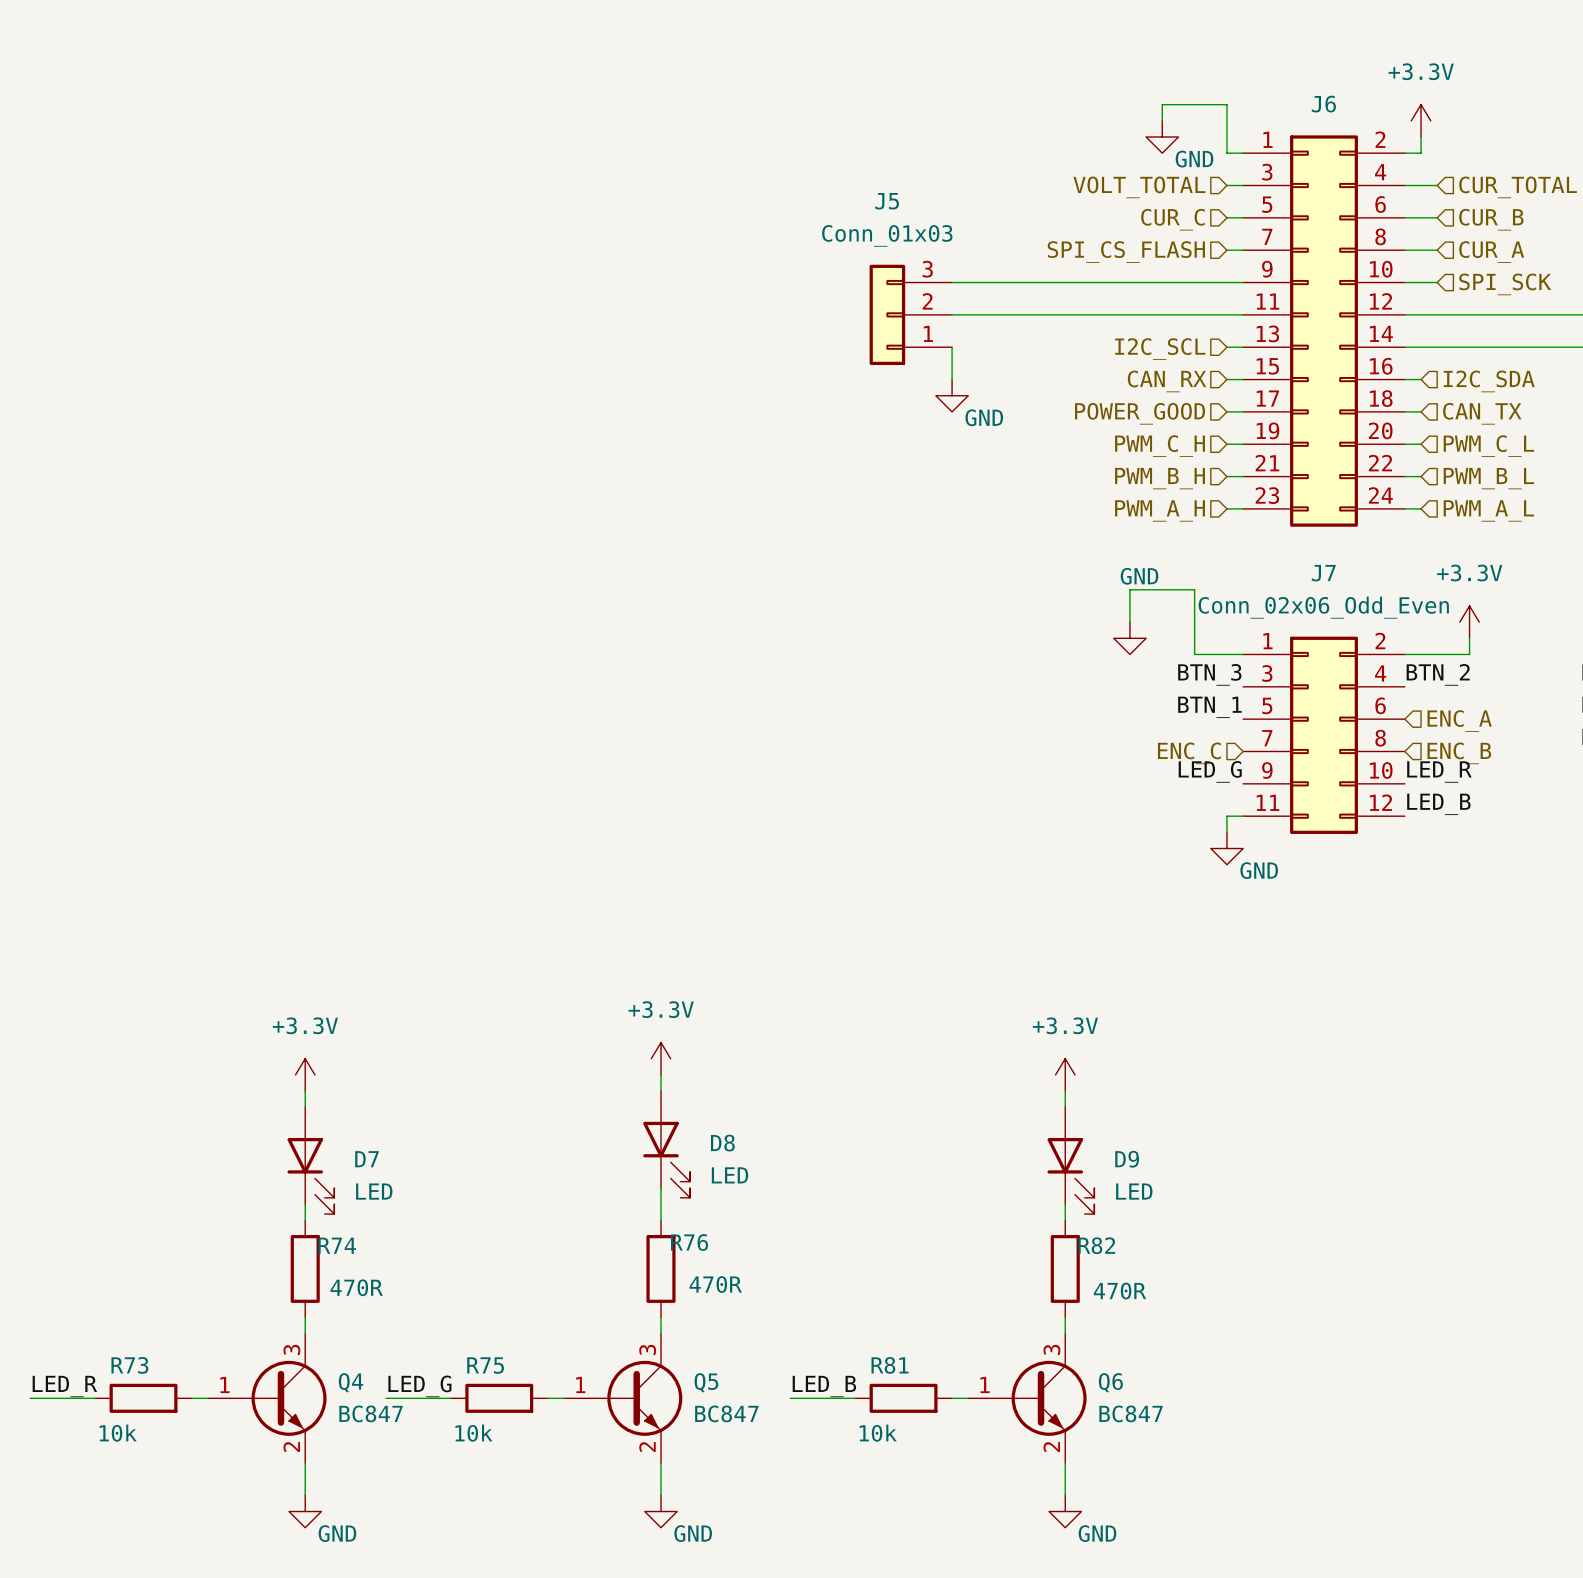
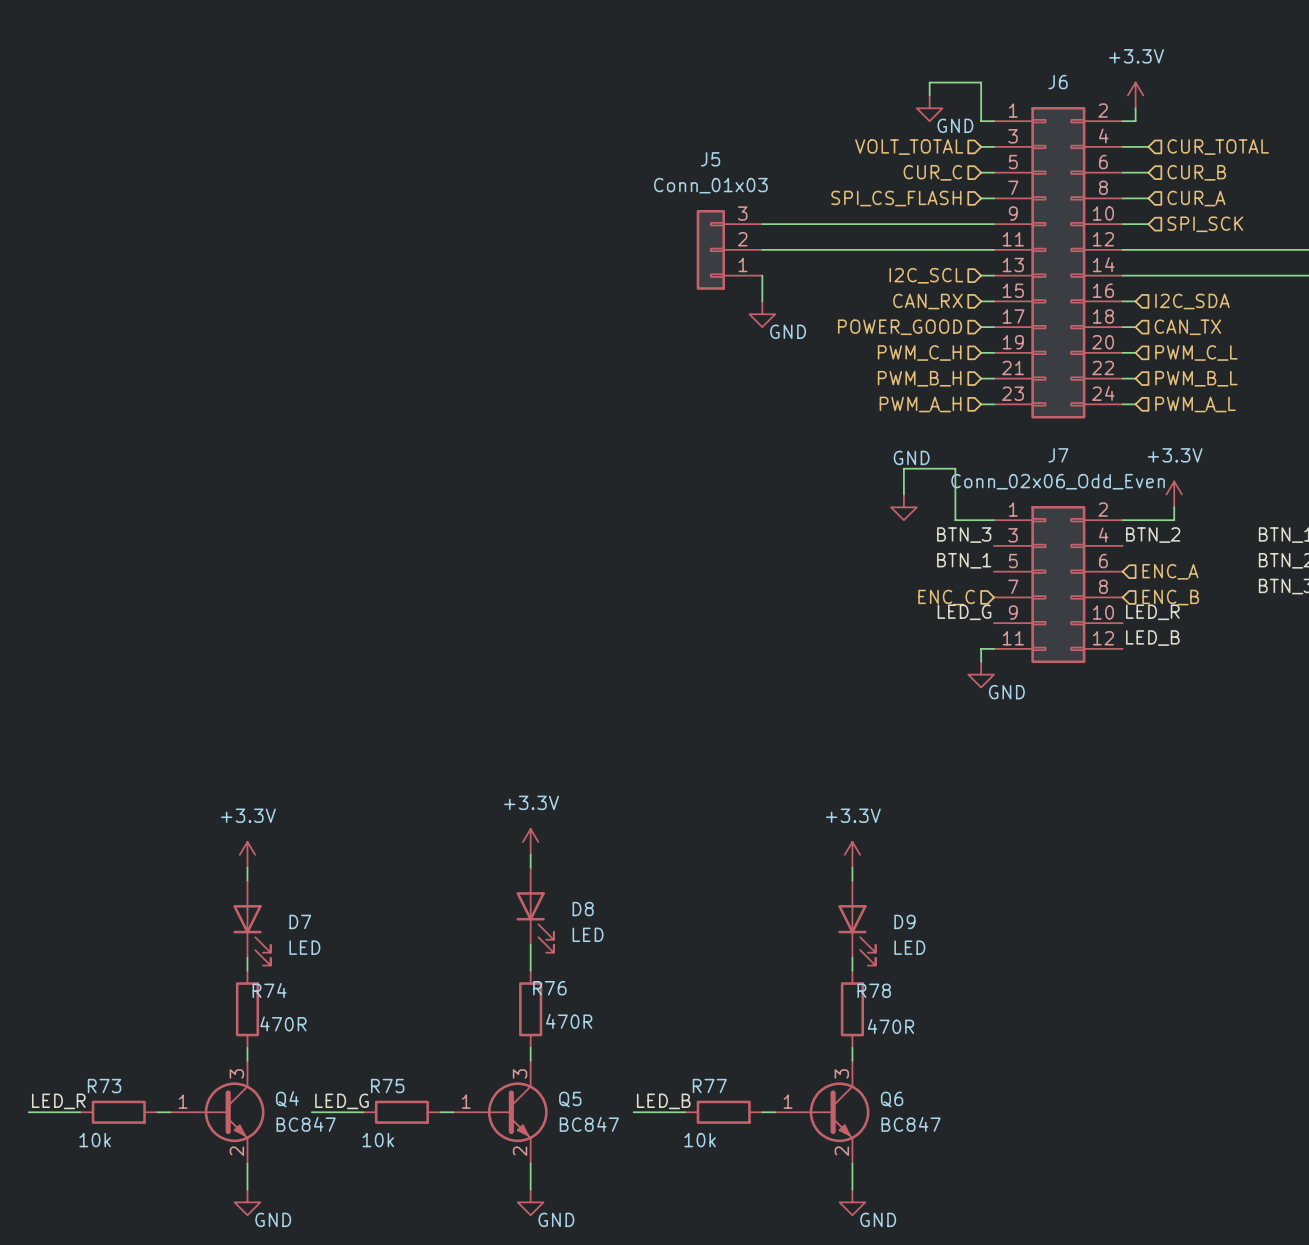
R82 name: R82 (1096, 1245) -> R78 (874, 990)
R81 name: R81 (890, 1365) -> R77 (709, 1086)

